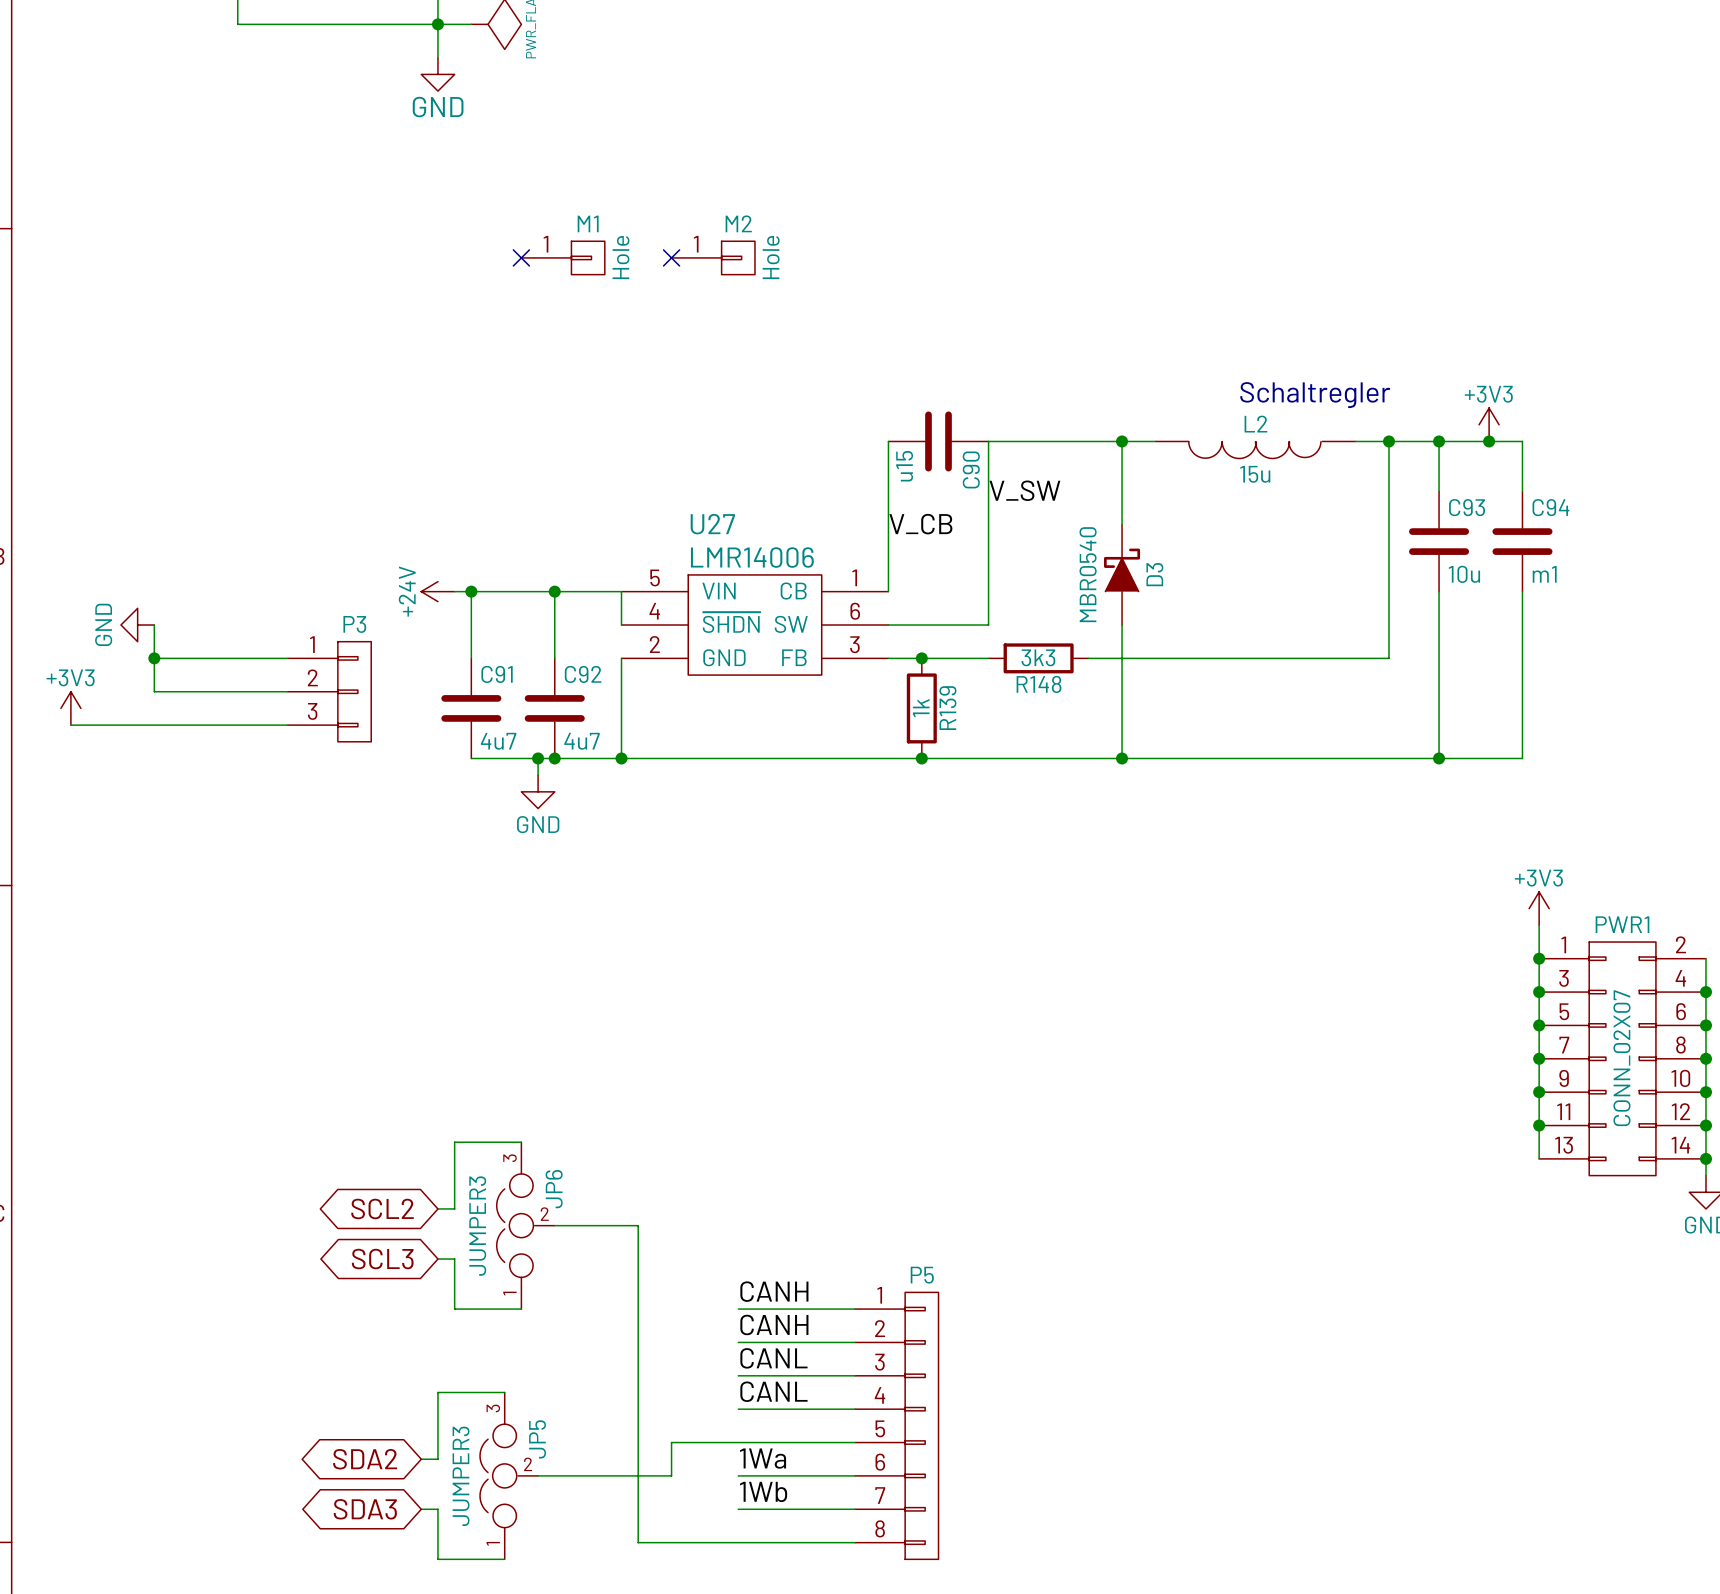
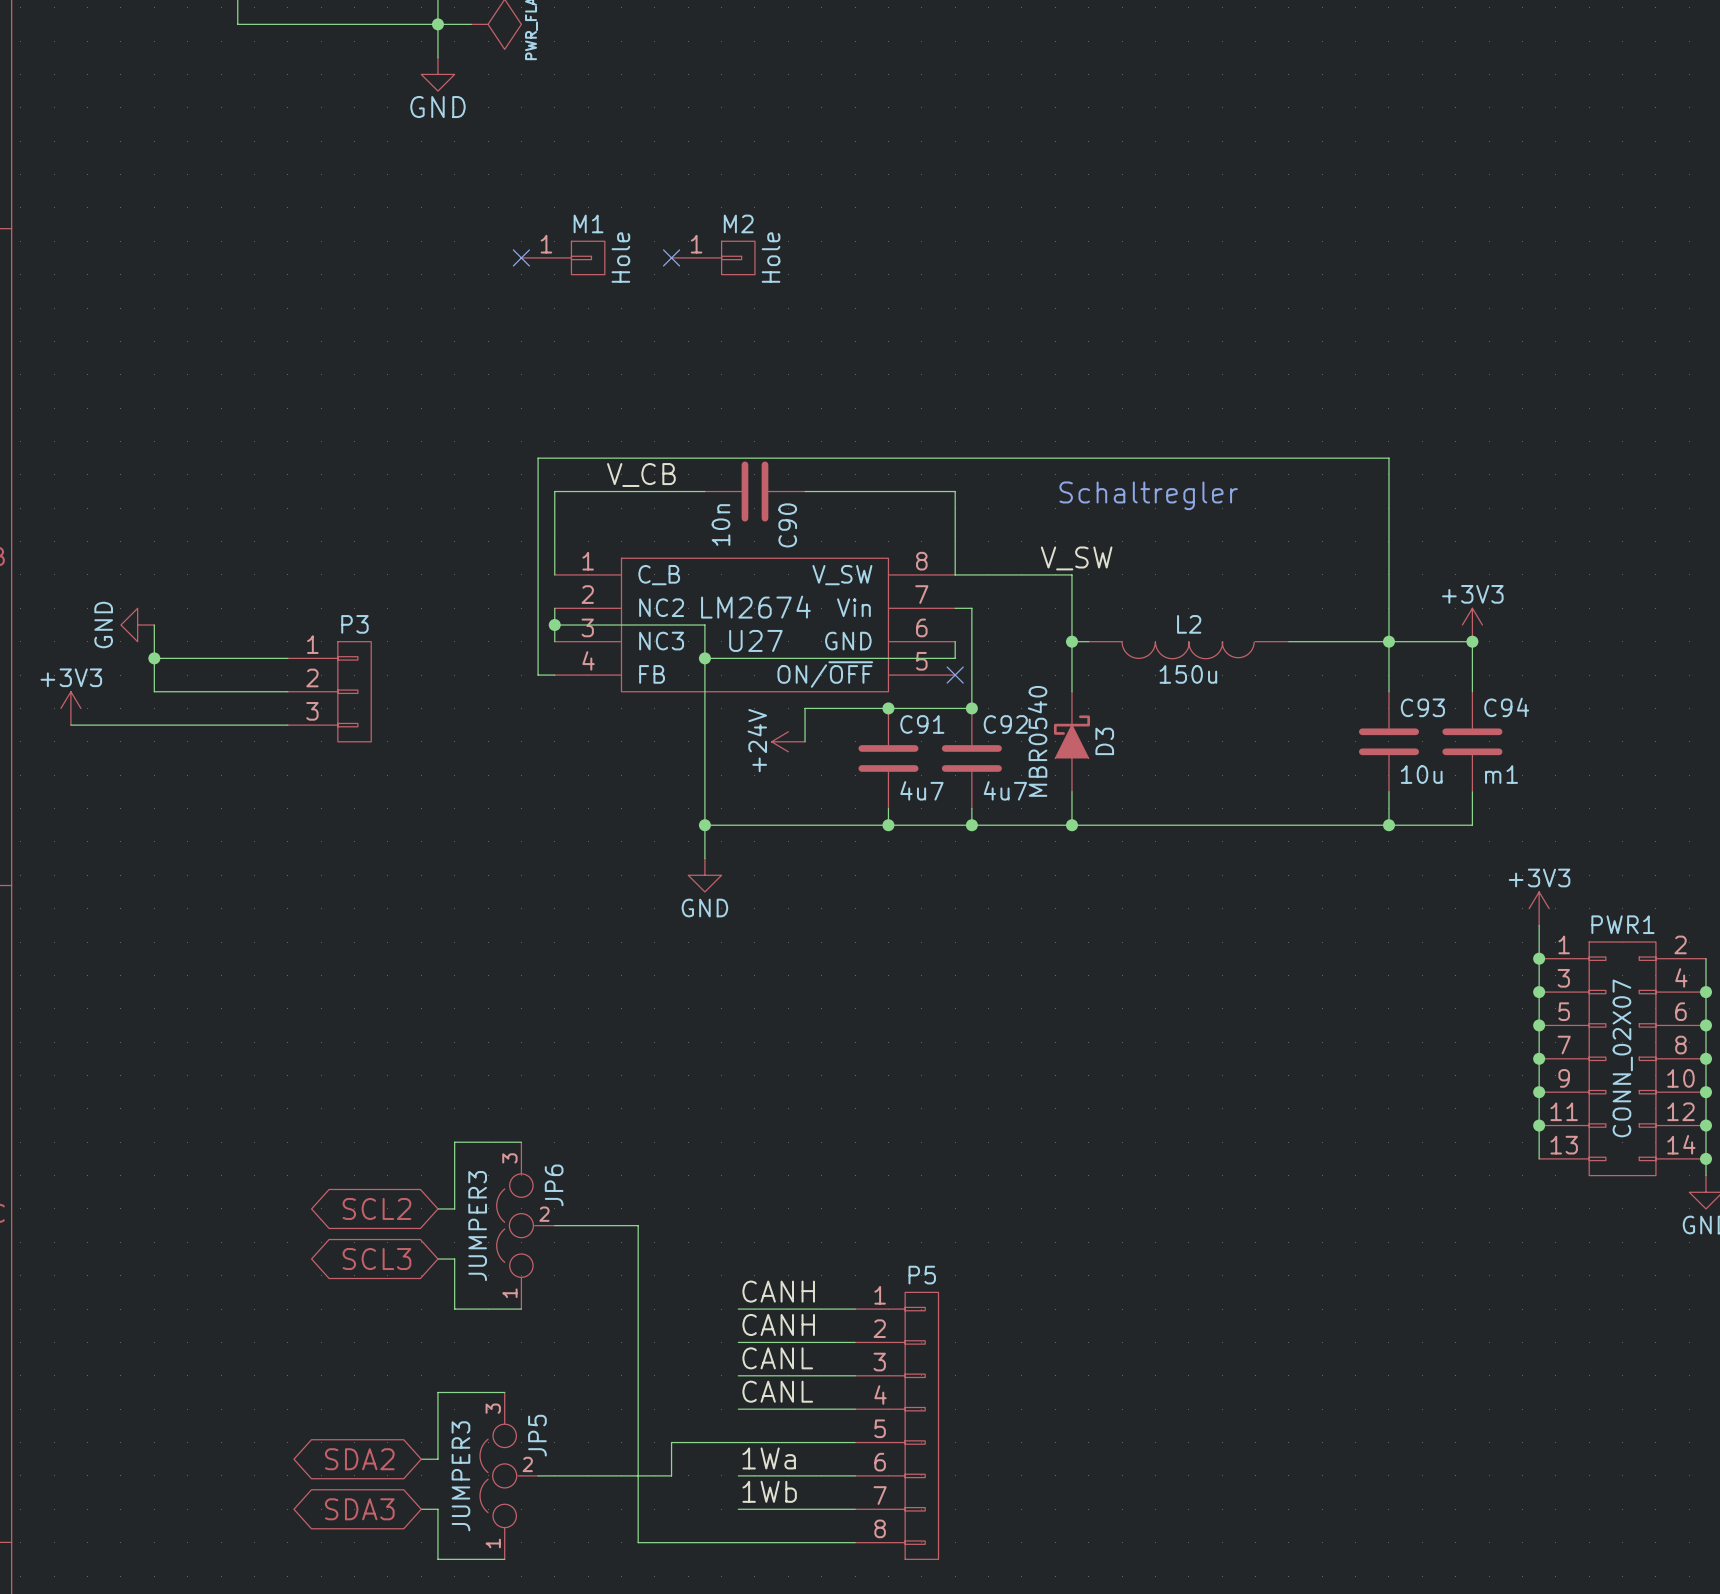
text position: Schaltregler (1315, 395) -> Schaltregler (1148, 495)
power symbol position: +3V3 (1489, 424) -> +3V3 (1472, 625)
wire: (888, 441) (888, 591) -> none
C90 position: (938, 441) -> (754, 491)
wire: (1122, 441) (1122, 524) -> none
junction: (1122, 441) -> none
wire: (1155, 441) (988, 441) (988, 625) (888, 625) -> none
wire: (1355, 441) (1522, 441) (1522, 491) -> none
wire: (1388, 441) (1388, 458) -> (554, 675) (538, 675) (538, 458) (1388, 458)
junction: (1388, 441) -> none
wire: (1439, 441) (1439, 491) -> none
junction: (1439, 441) -> none
junction: (1489, 441) -> none
L2 position: (1255, 449) -> (1188, 650)
C90 value: u15 (904, 466) -> 10n (720, 525)
L2 value: 15u (1255, 474) -> 150u (1188, 674)
label position: V_SW (1024, 490) -> V_SW (1076, 558)
wire: none -> (704, 491) (554, 491) (554, 574)
wire: none -> (805, 491) (955, 491) (955, 574) (1071, 574) (1071, 691)
U27 name position: U27 (712, 524) -> U27 (755, 640)
label position: V_CB (920, 524) -> V_CB (641, 475)
C93 position: (1439, 541) -> (1388, 741)
C94 position: (1522, 541) -> (1472, 741)
U27 value: LMR14006 (752, 557) -> LM2674 (755, 607)
U27 symbol: [621, 574, 889, 676] -> [554, 558, 956, 692]
D3 position: (1122, 574) -> (1071, 741)
power symbol: +24V (437, 591) -> none
wire: (454, 591) (621, 591) (621, 625) -> none
wire: (471, 591) (471, 658) -> none
junction: (471, 591) -> none
wire: (554, 591) (554, 608) -> none
junction position: (554, 591) -> (554, 625)
wire: (1439, 591) (1439, 758) -> none
wire: (1522, 591) (1522, 758) (471, 758) -> none
wire: none -> (955, 608) (971, 608) (971, 708) (805, 708) (805, 741)
wire: none -> (554, 625) (704, 625) (704, 858)
wire: (1122, 625) (1122, 758) -> none
wire: (554, 641) (554, 658) -> none
wire: none -> (1071, 641) (1088, 641)
junction: none -> (1071, 641)
wire: none -> (1288, 641) (1472, 641) (1472, 691)
junction: none -> (1388, 641)
junction: none -> (1472, 641)
wire: (621, 658) (621, 758) -> none
wire: none -> (704, 658) (888, 658)
junction: none -> (704, 658)
junction: (921, 658) -> none
wire: (955, 658) (988, 658) -> (955, 658) (955, 641)
R148: 3k3 (1038, 658) -> none
wire: (1088, 658) (1388, 658) -> (1388, 691) (1388, 658)
no-connect mark: none -> (955, 675)
C91 position: (471, 708) -> (888, 758)
C92 position: (554, 708) -> (971, 758)
junction: none -> (888, 708)
R139: 1k (921, 708) -> none
junction: none -> (971, 708)
power symbol: none -> +24V (788, 741)
wire: (538, 758) (538, 775) -> none
junction: (538, 758) -> none
junction: (554, 758) -> none
junction: (621, 758) -> none
junction: (921, 758) -> none
junction: (1122, 758) -> none
junction: (1439, 758) -> none
power symbol position: GND (538, 791) -> GND (704, 875)
wire: none -> (1071, 791) (1071, 825)
wire: none -> (1388, 791) (1388, 825)
wire: none -> (1472, 791) (1472, 825) (704, 825)
wire: none -> (888, 808) (888, 825)
wire: none -> (971, 808) (971, 825)
junction: none -> (704, 825)
junction: none -> (888, 825)
junction: none -> (971, 825)
junction: none -> (1071, 825)
junction: none -> (1388, 825)

